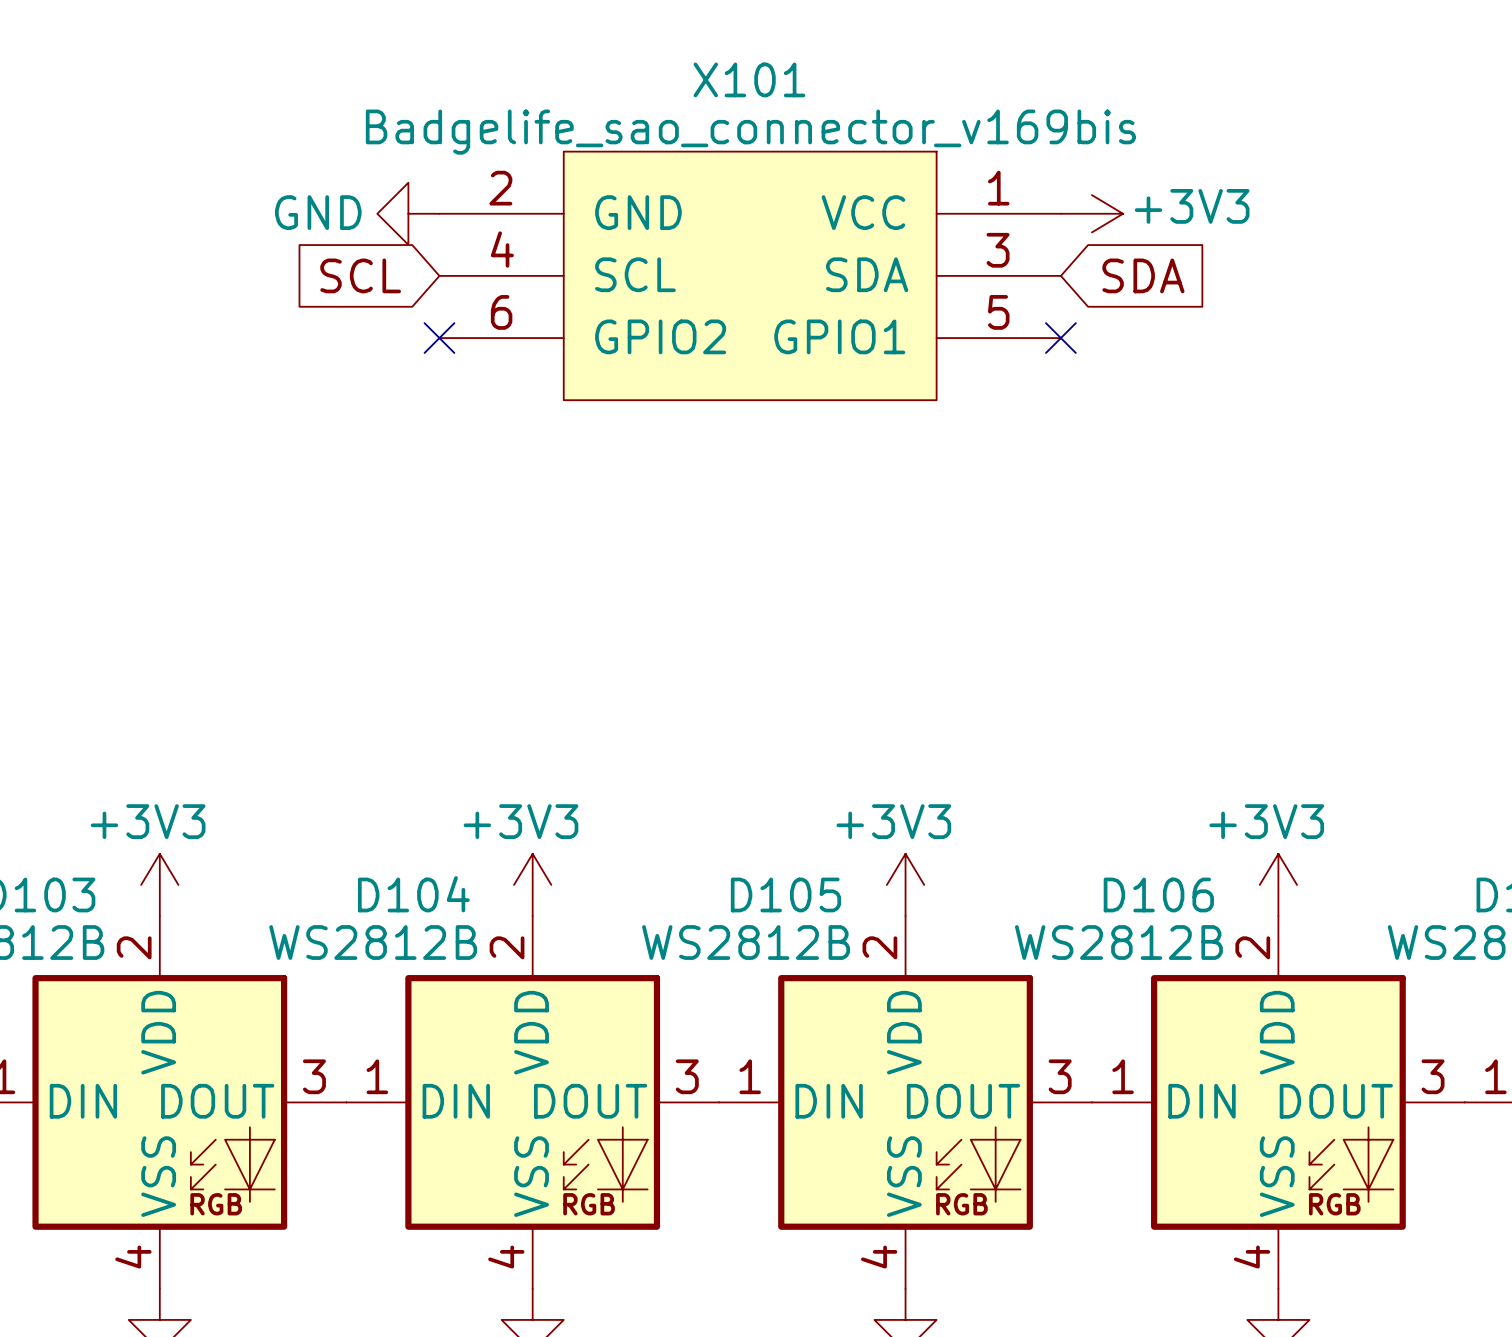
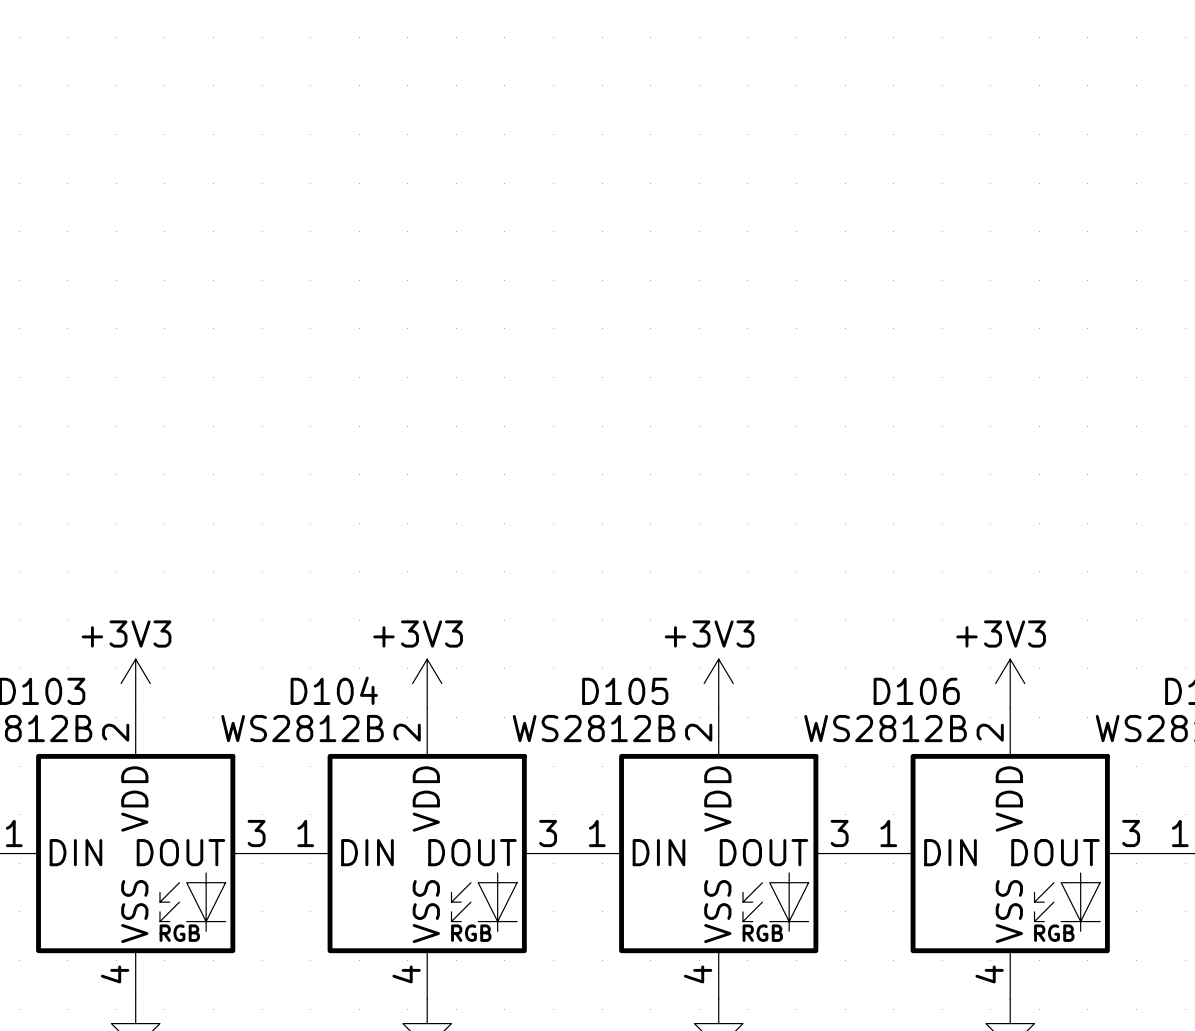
power symbol: GND (408, 213) -> none
power symbol: +3V3 (1091, 213) -> none
global label: SCL (360, 275) -> none
X101: Badgelife_sao_connector_v169bis (750, 275) -> none
global label: SDA (1143, 275) -> none
no-connect mark: (439, 338) -> none
no-connect mark: (1060, 338) -> none

